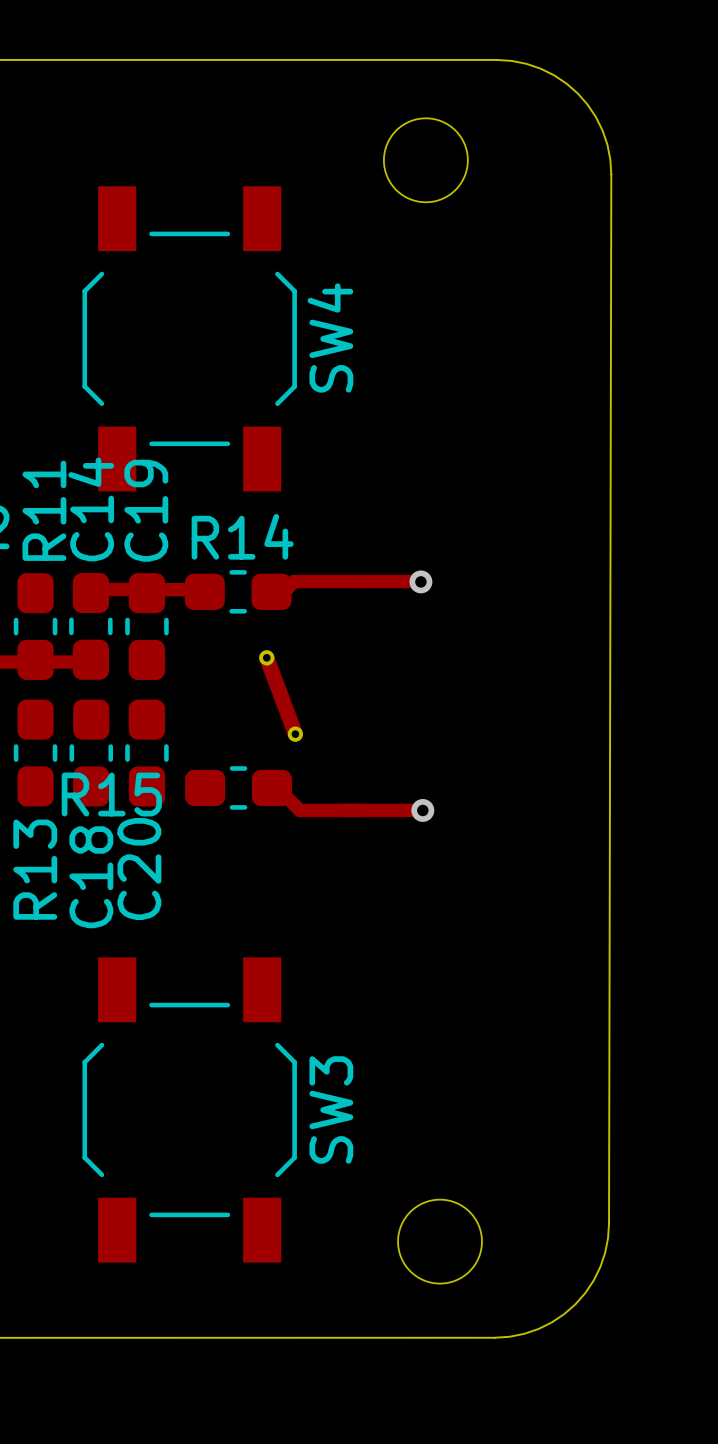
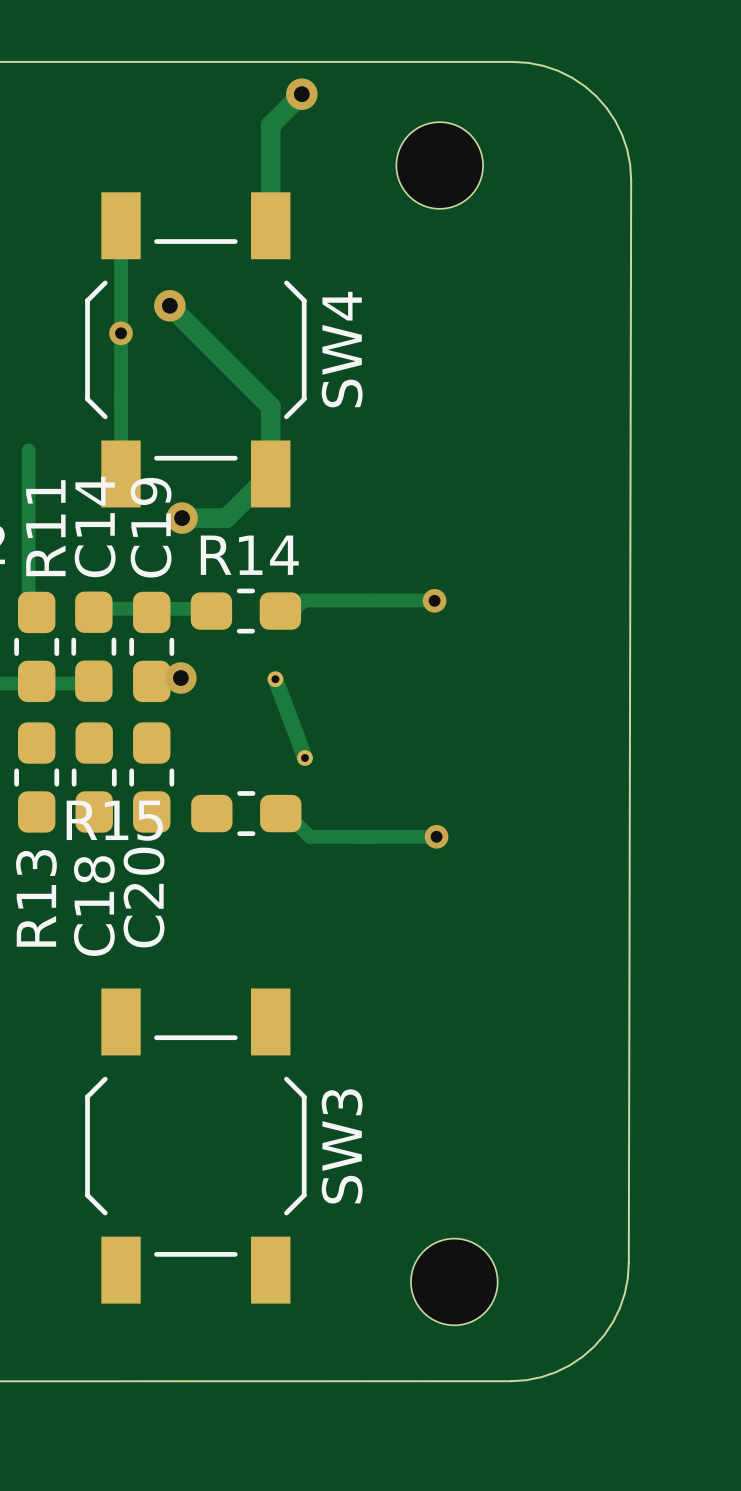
track: none -> (301, 94) (270, 125) (270, 225)
via: none -> (301, 94)
track: none -> (121, 225) (121, 473)
track: none -> (169, 305) (270, 406) (270, 473) (226, 518) (182, 518)
via: none -> (169, 305)
via: none -> (121, 333)
track: none -> (28, 450) (28, 604) (36, 612)
via: none -> (182, 518)
via: none -> (180, 678)

